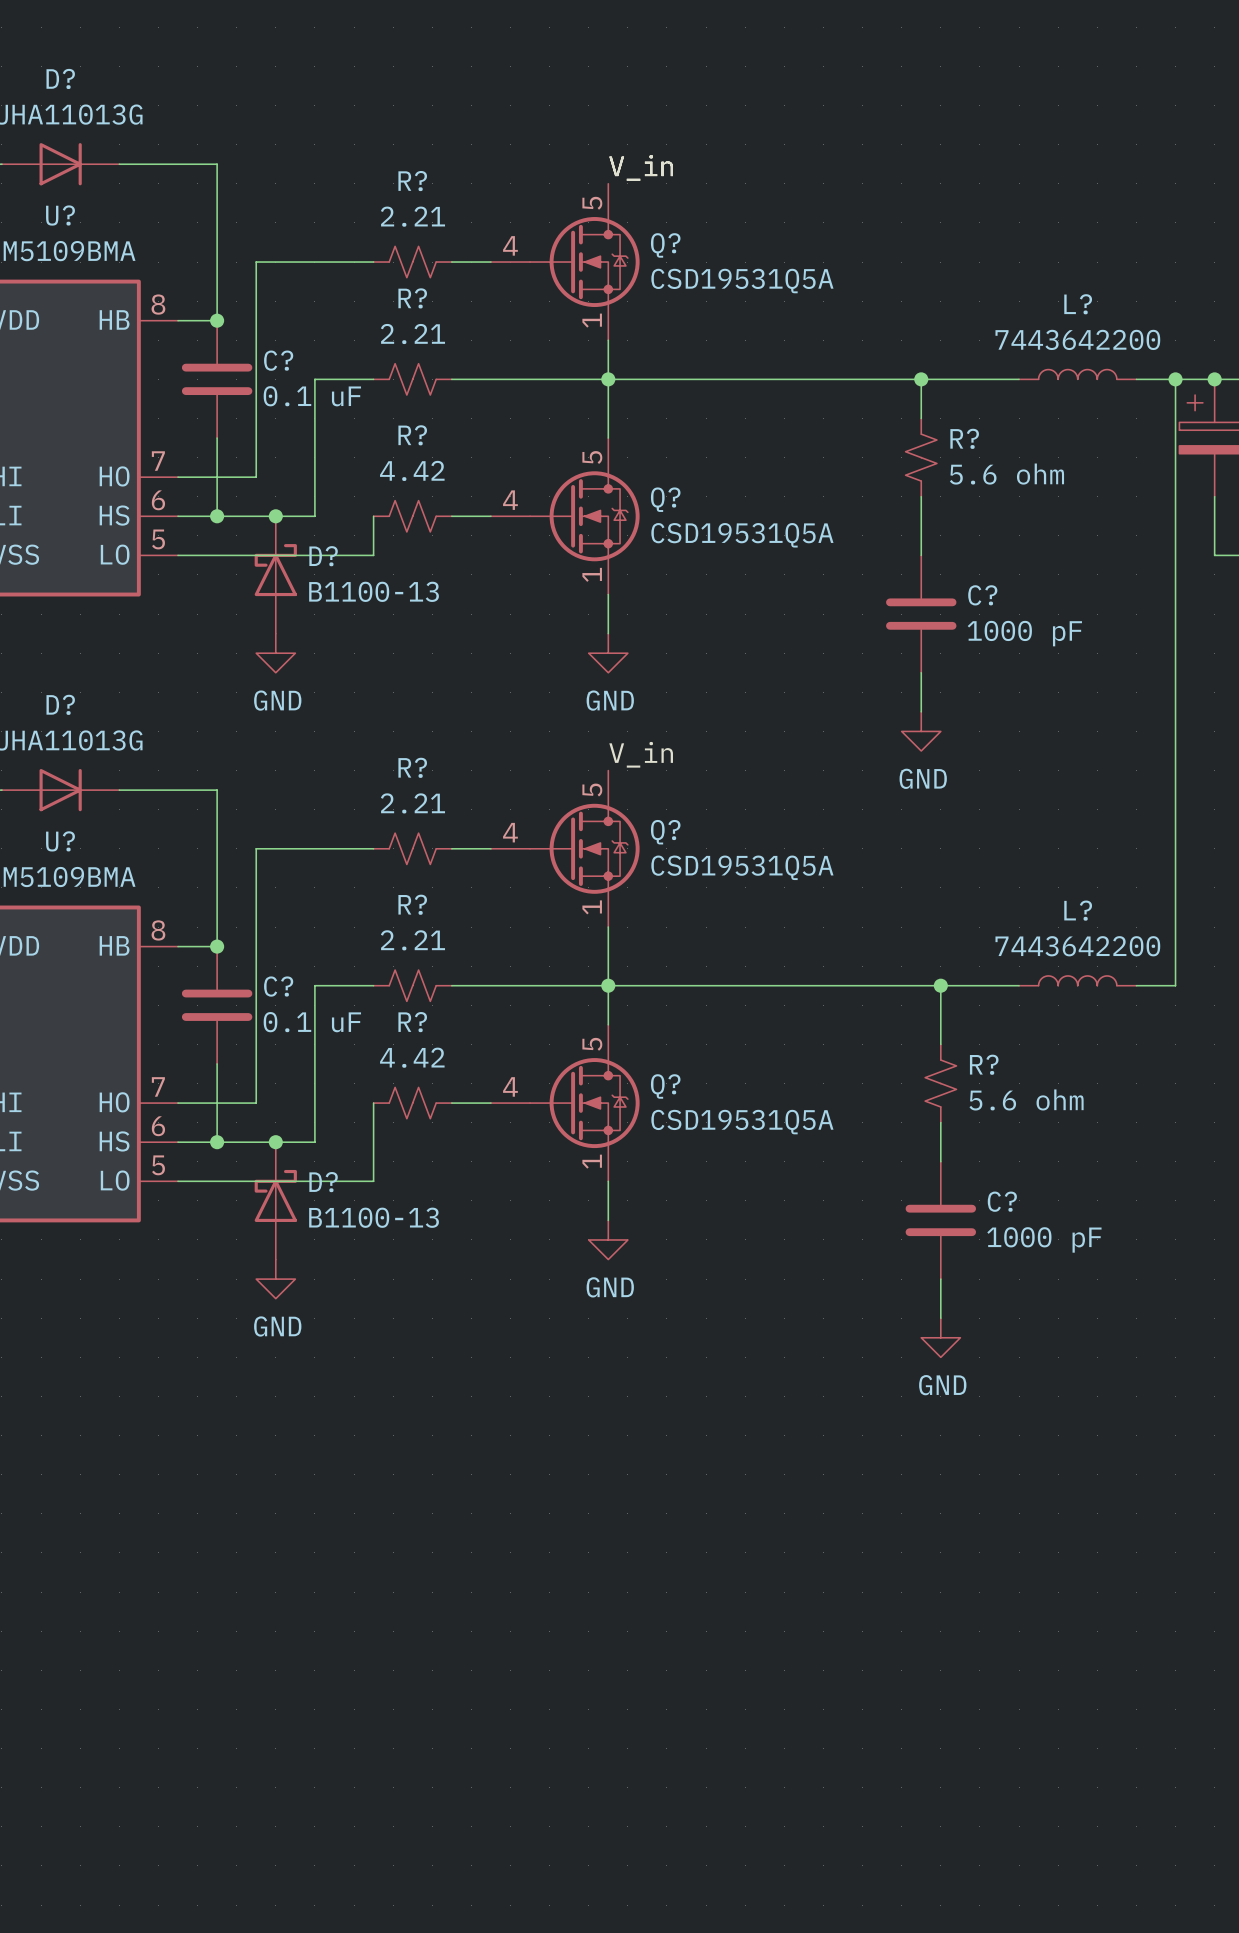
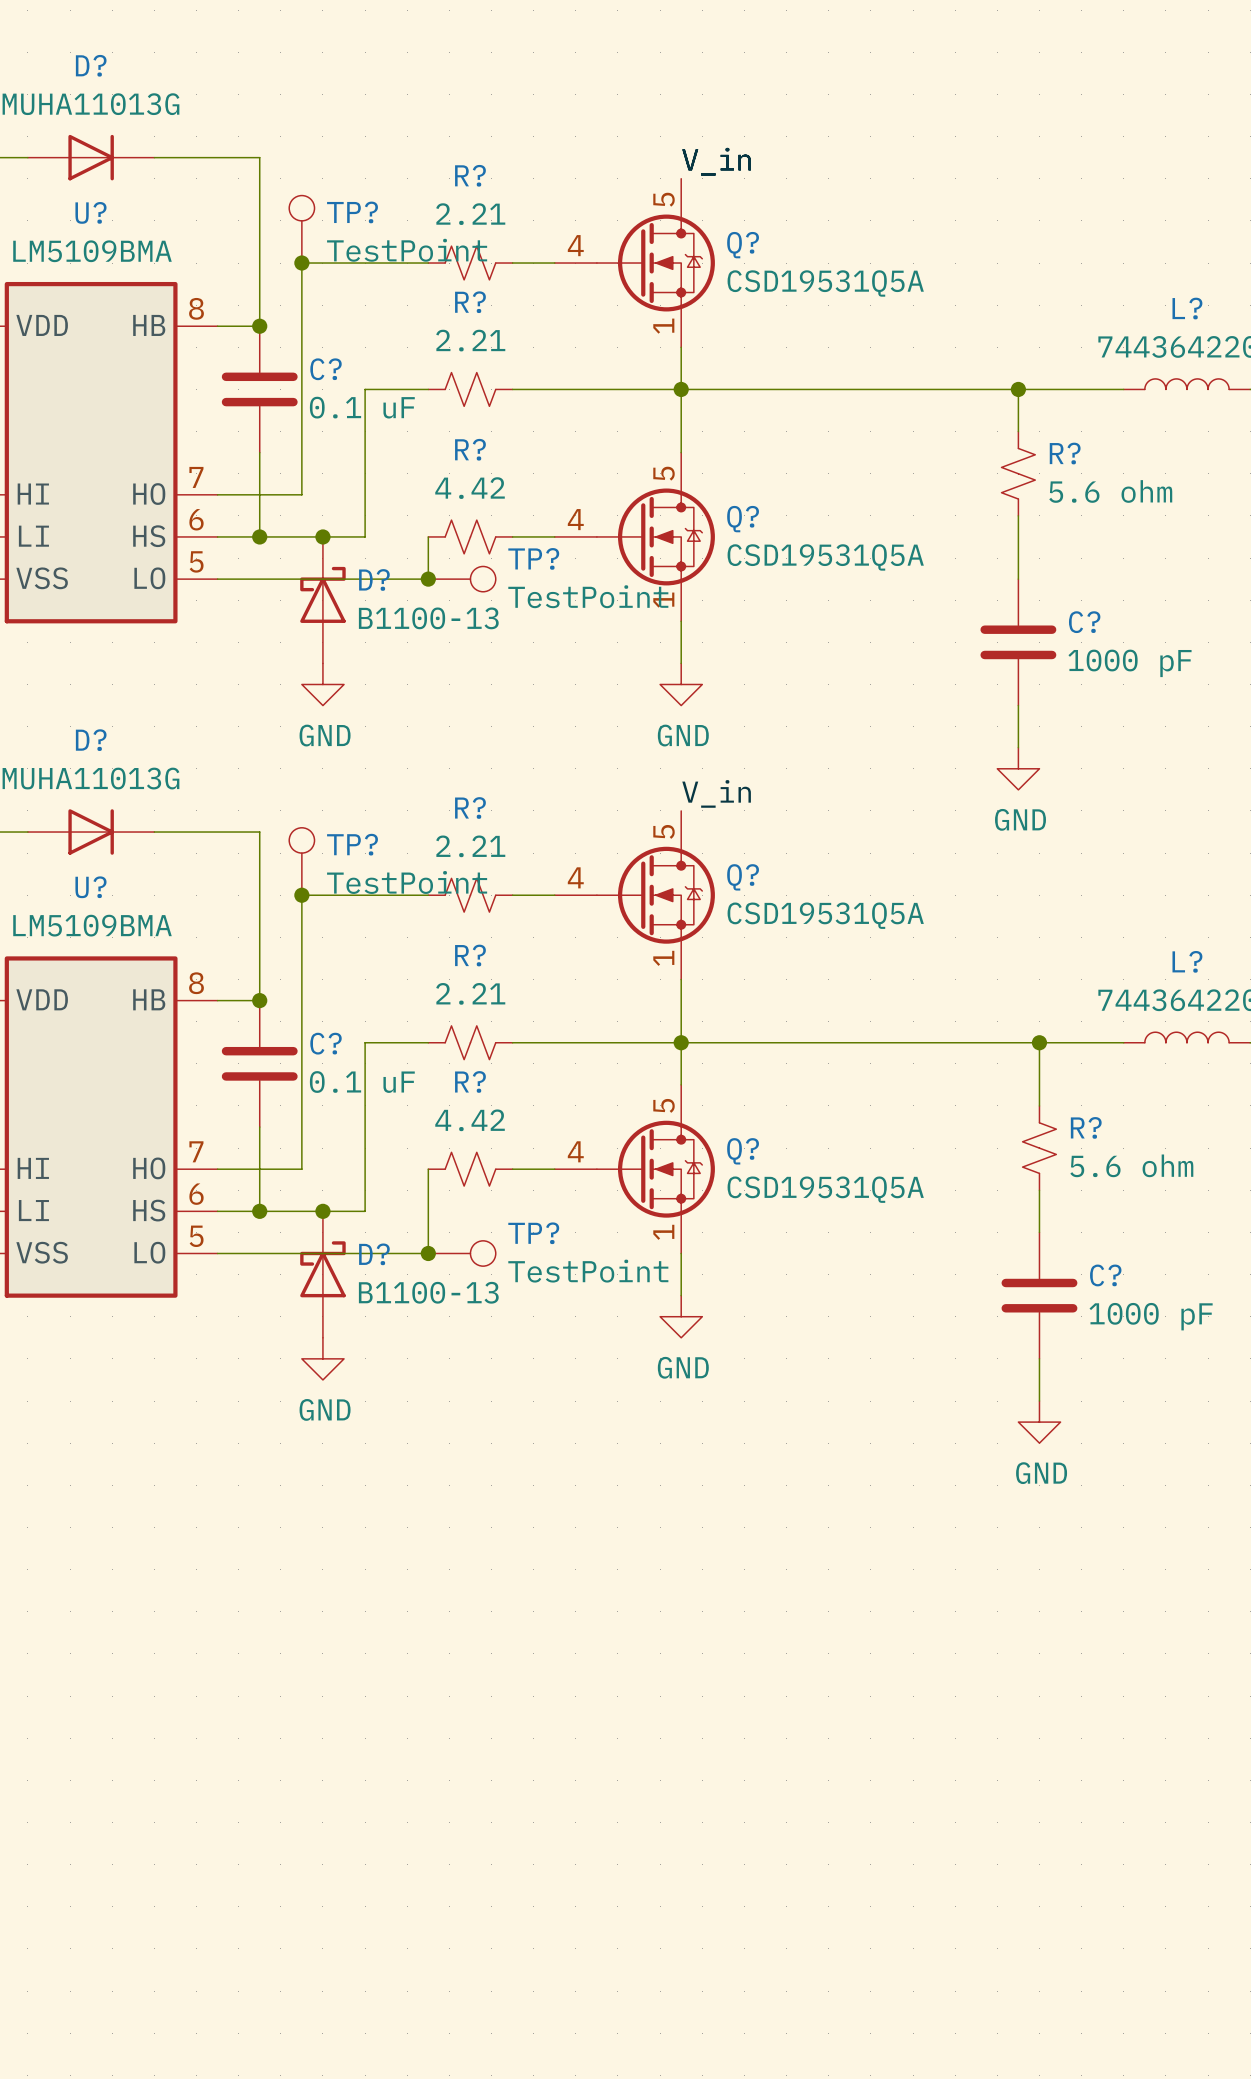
TP?: none -> TestPoint (301, 229)
junction: none -> (301, 263)
junction: none -> (428, 579)
TP?: none -> TestPoint (462, 579)
TP?: none -> TestPoint (301, 861)
junction: none -> (301, 895)
junction: none -> (428, 1253)
TP?: none -> TestPoint (462, 1253)

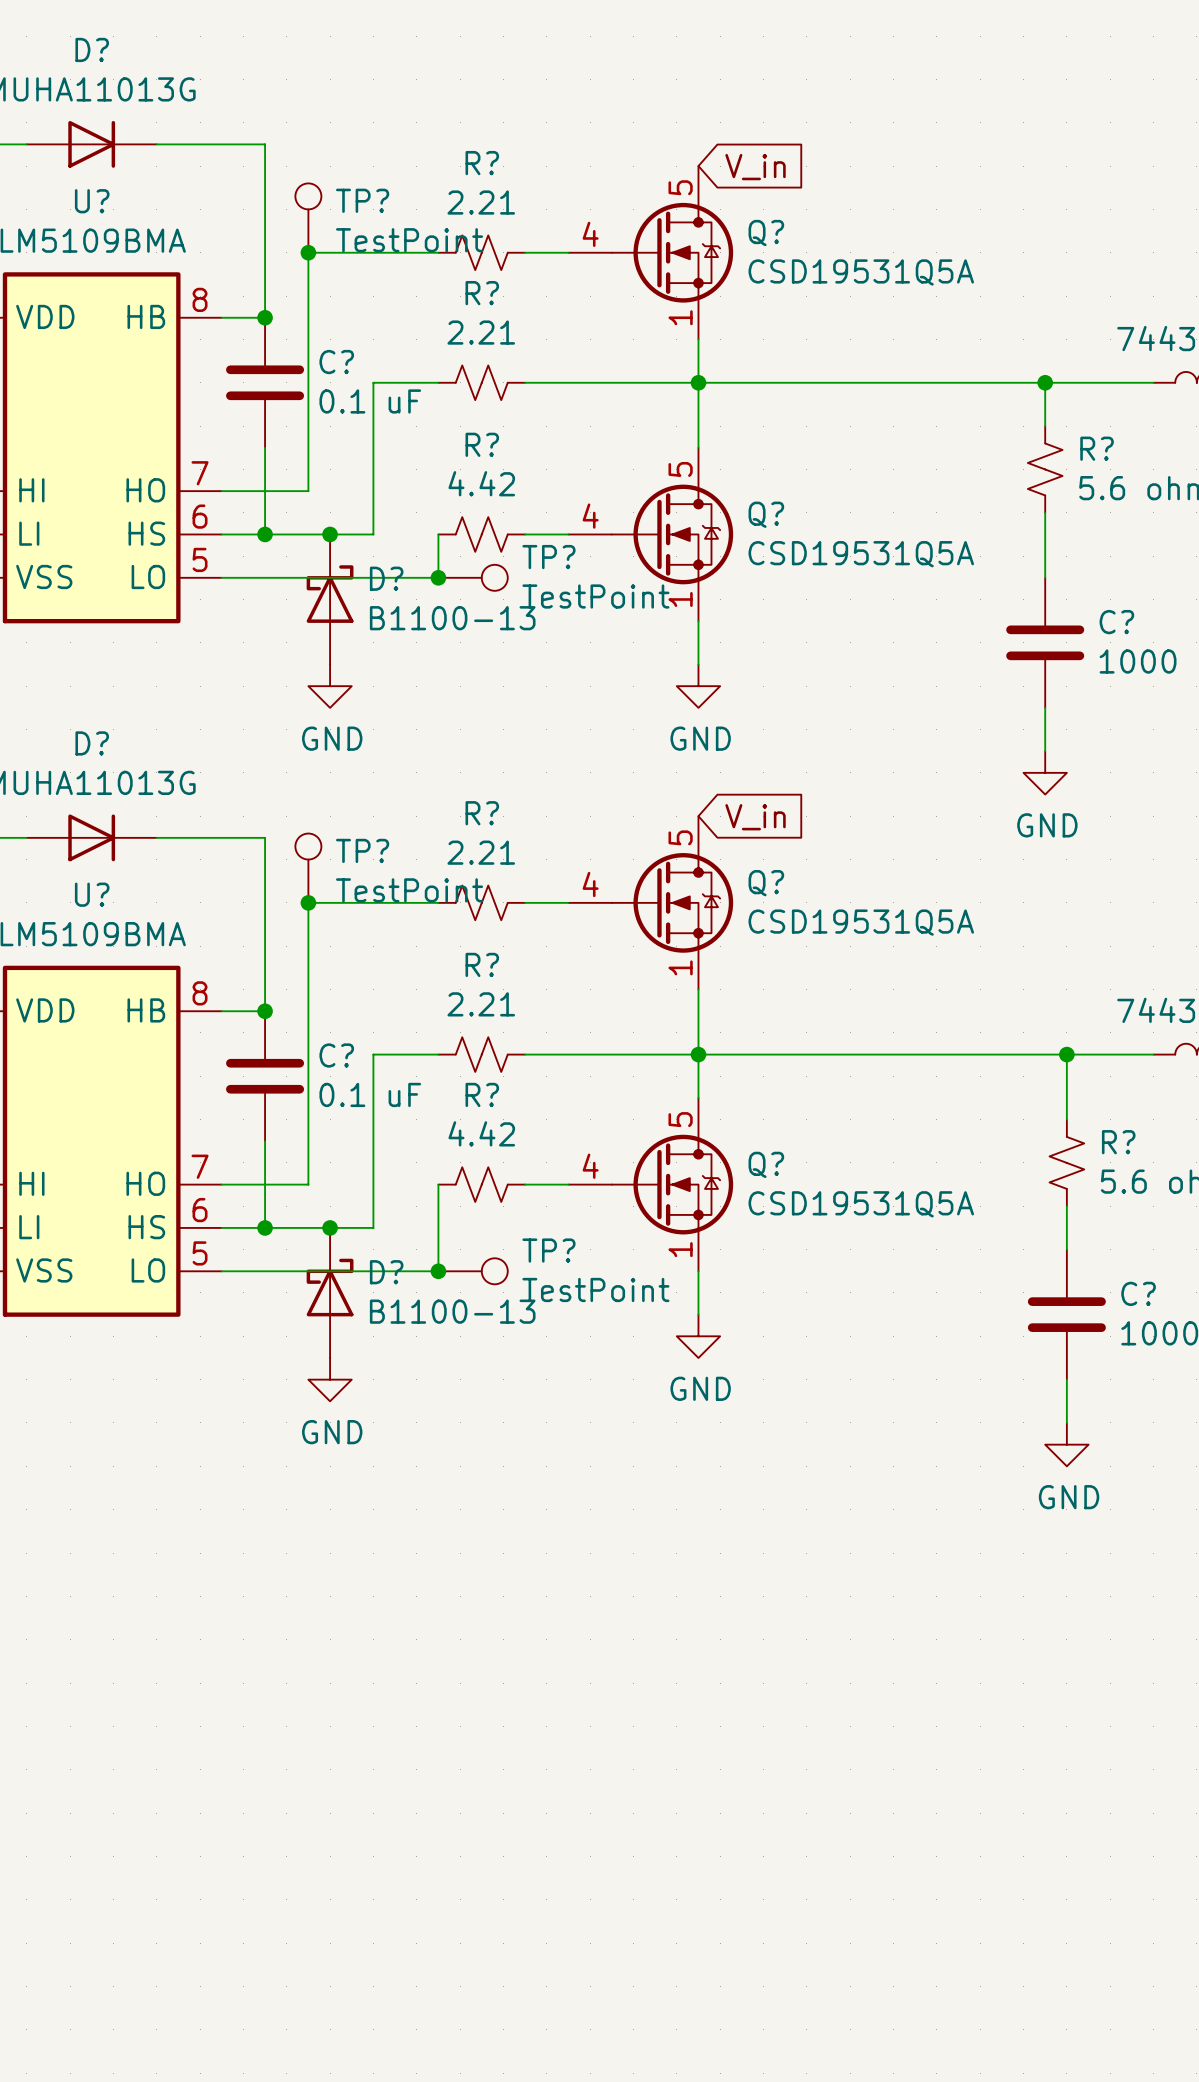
label: V_in (716, 161) -> none
global label: none -> V_in (755, 167)
label: V_in (716, 793) -> none
global label: none -> V_in (755, 817)

